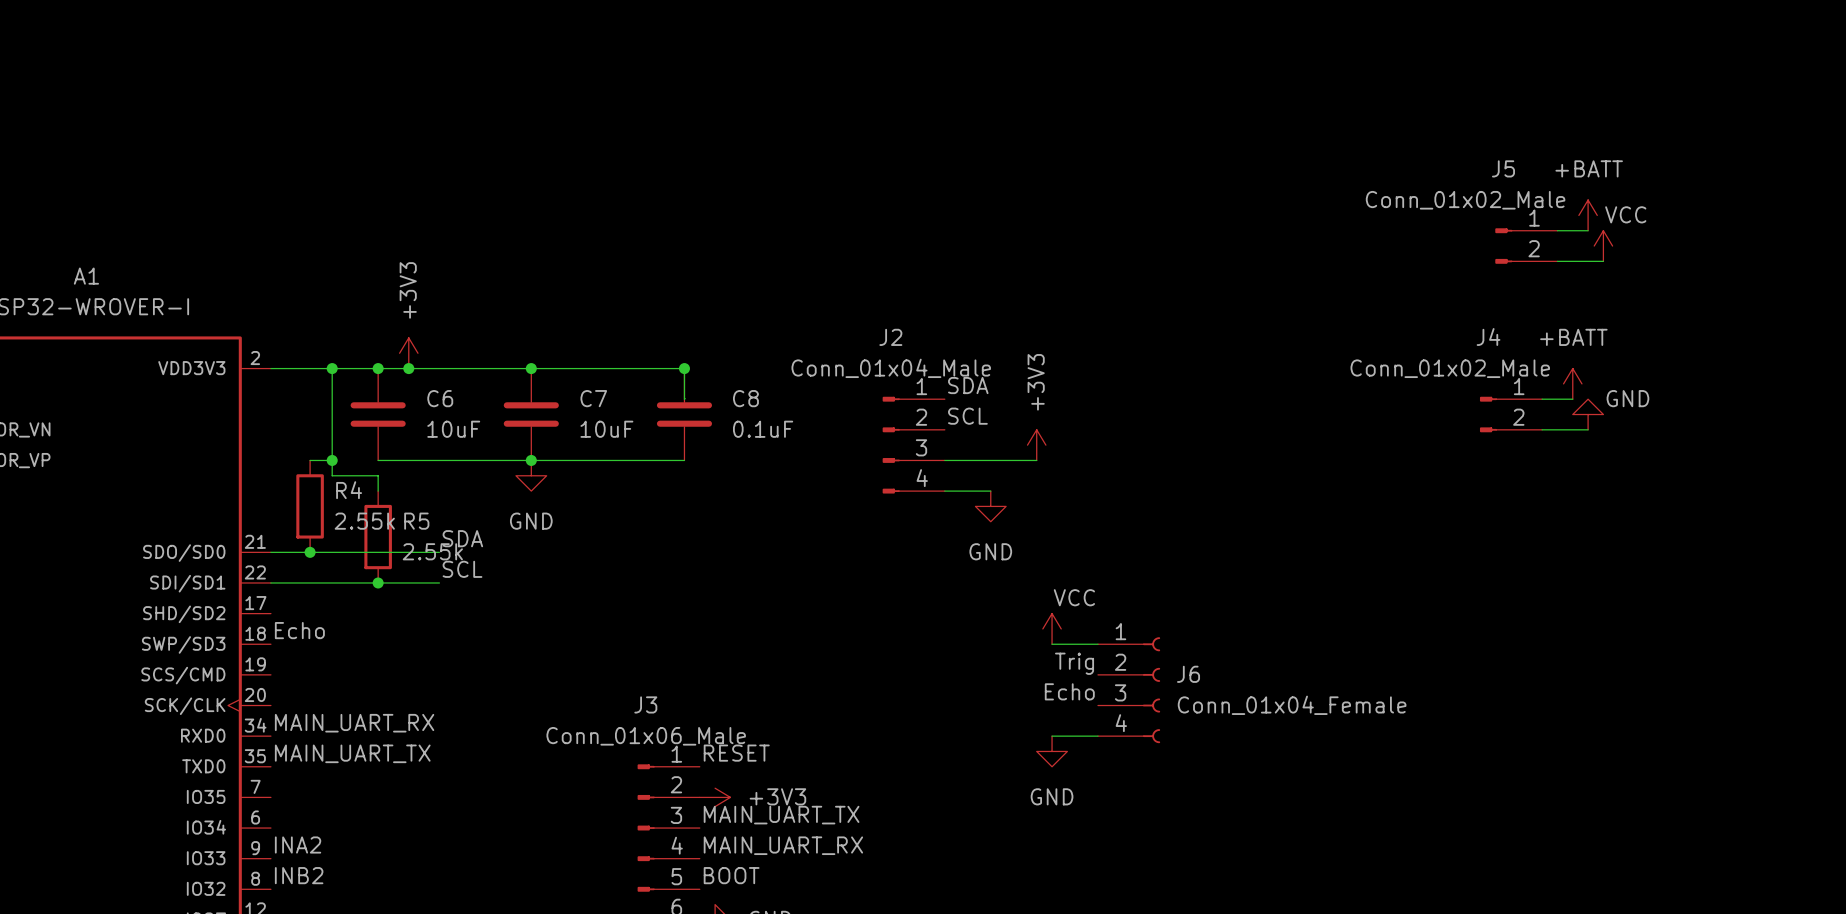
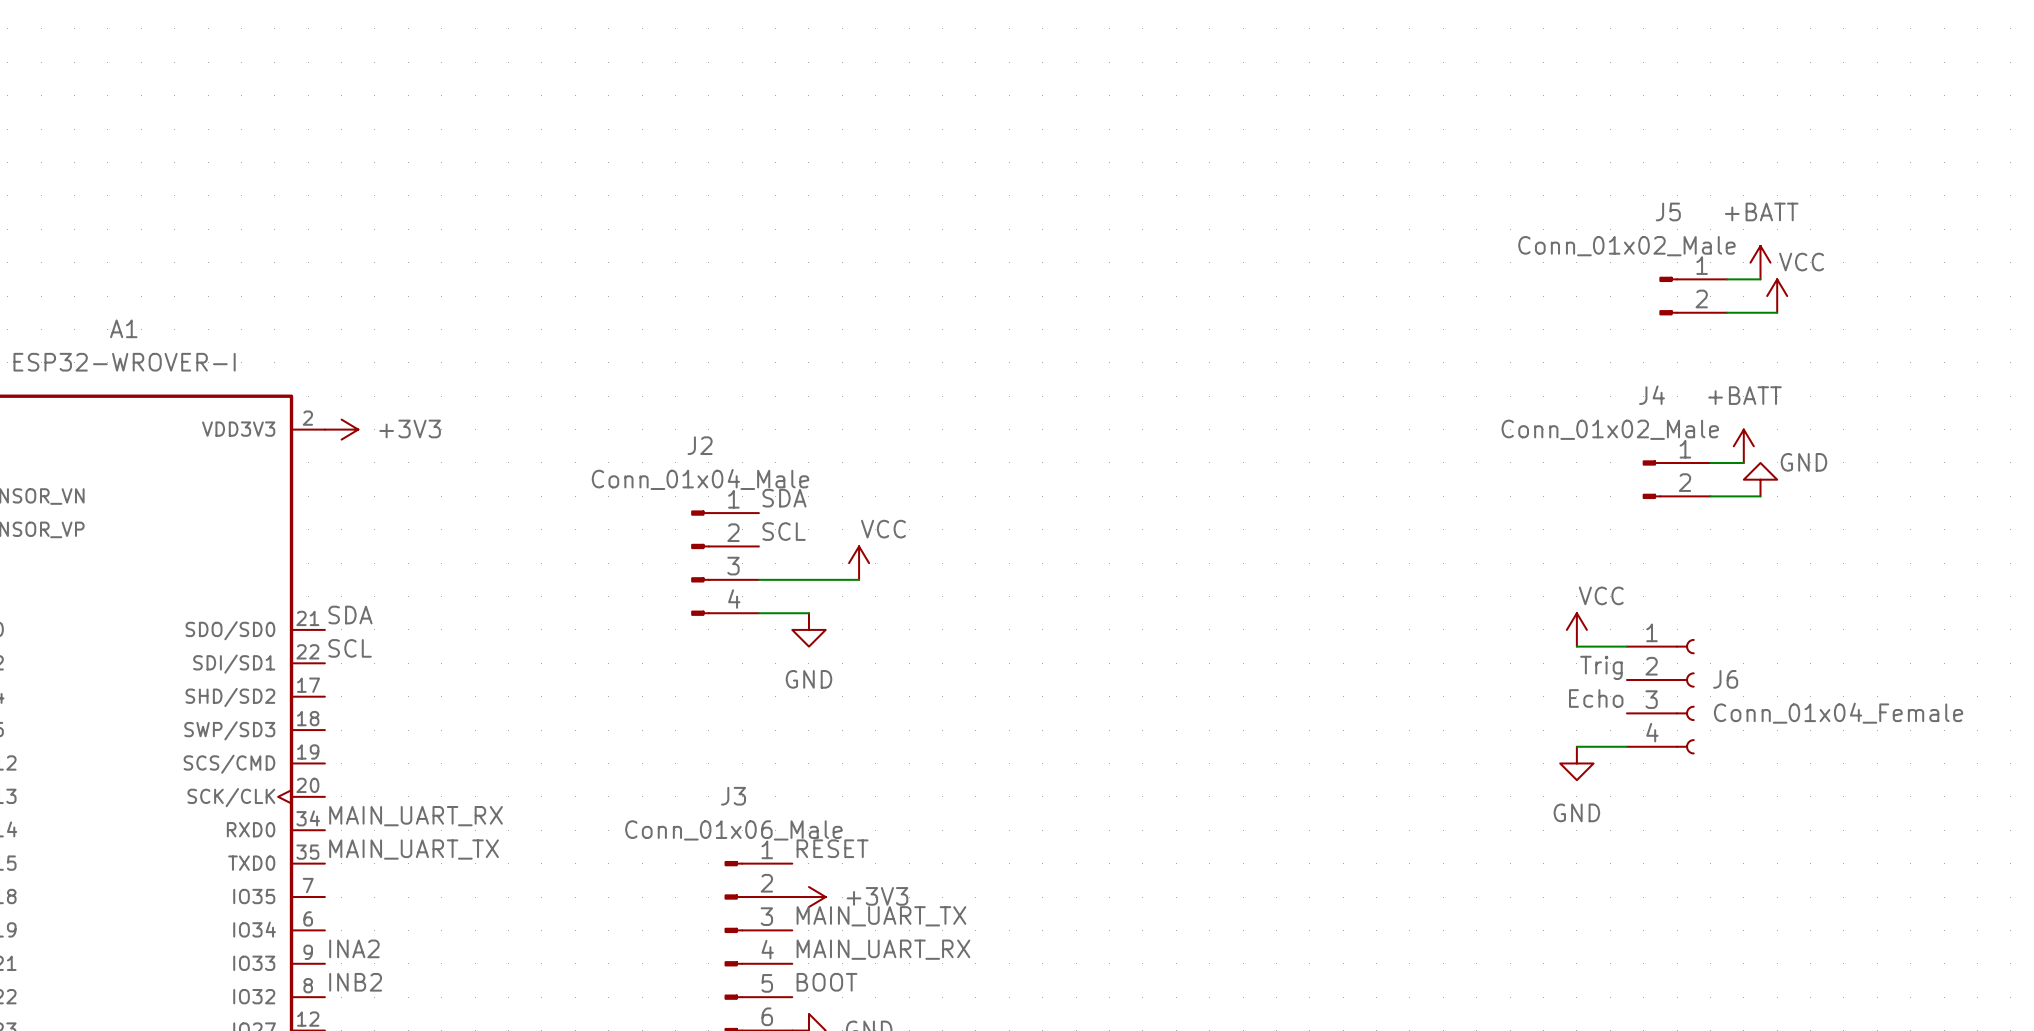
power symbol rotation: 0° (408, 353) -> 90° clockwise (341, 429)
power symbol position: +3V3 (408, 353) -> +3V3 (341, 429)
wire: (270, 368) (684, 368) (685, 398) -> none
wire: (332, 368) (332, 475) (378, 475) (378, 491) -> none
junction: (332, 368) -> none
junction: (378, 368) -> none
junction: (408, 368) -> none
junction: (531, 368) -> none
junction: (684, 368) -> none
label: SDA (968, 385) -> none
C6: 10uF (378, 414) -> none
C7: 10uF (531, 414) -> none
C8: 0.1uF (684, 414) -> none
label: SCL (967, 416) -> none
label: none -> SDA (784, 498)
J2 position: (913, 445) -> (725, 563)
power symbol: +3V3 (1036, 445) -> none
wire: (310, 460) (332, 460) -> none
junction: (332, 460) -> none
wire: (378, 460) (684, 460) -> none
junction: (531, 460) -> none
wire: (944, 460) (1036, 460) -> (758, 579) (859, 579)
label: none -> SCL (784, 531)
power symbol: GND (531, 475) -> none
power symbol: none -> VCC (859, 563)
wire: (944, 491) (990, 491) -> (758, 613) (808, 613)
R4: 2.55k (310, 506) -> none
power symbol: GND (990, 506) -> none
R5: 2.55k (378, 537) -> none
label: none -> SDA (350, 615)
label: SDA (462, 538) -> none
wire: (270, 552) (439, 552) -> none
junction: (310, 552) -> none
power symbol: none -> GND (808, 629)
power symbol: none -> VCC (1576, 629)
wire: none -> (1576, 646) (1626, 646)
label: none -> SCL (350, 648)
label: SCL (462, 569) -> none
wire: (270, 582) (439, 582) -> none
junction: (378, 582) -> none
label: none -> Trig (1601, 667)
label: none -> Echo (1596, 698)
power symbol: VCC (1052, 628) -> none
label: Echo (299, 630) -> none
wire: (1052, 644) (1097, 644) -> none
wire: none -> (1576, 746) (1626, 746)
label: Trig (1074, 663) -> none
power symbol: none -> GND (1576, 763)
J6 position: (1129, 690) -> (1660, 696)
label: Echo (1069, 691) -> none
wire: (1052, 736) (1097, 736) -> none
power symbol: GND (1052, 751) -> none

